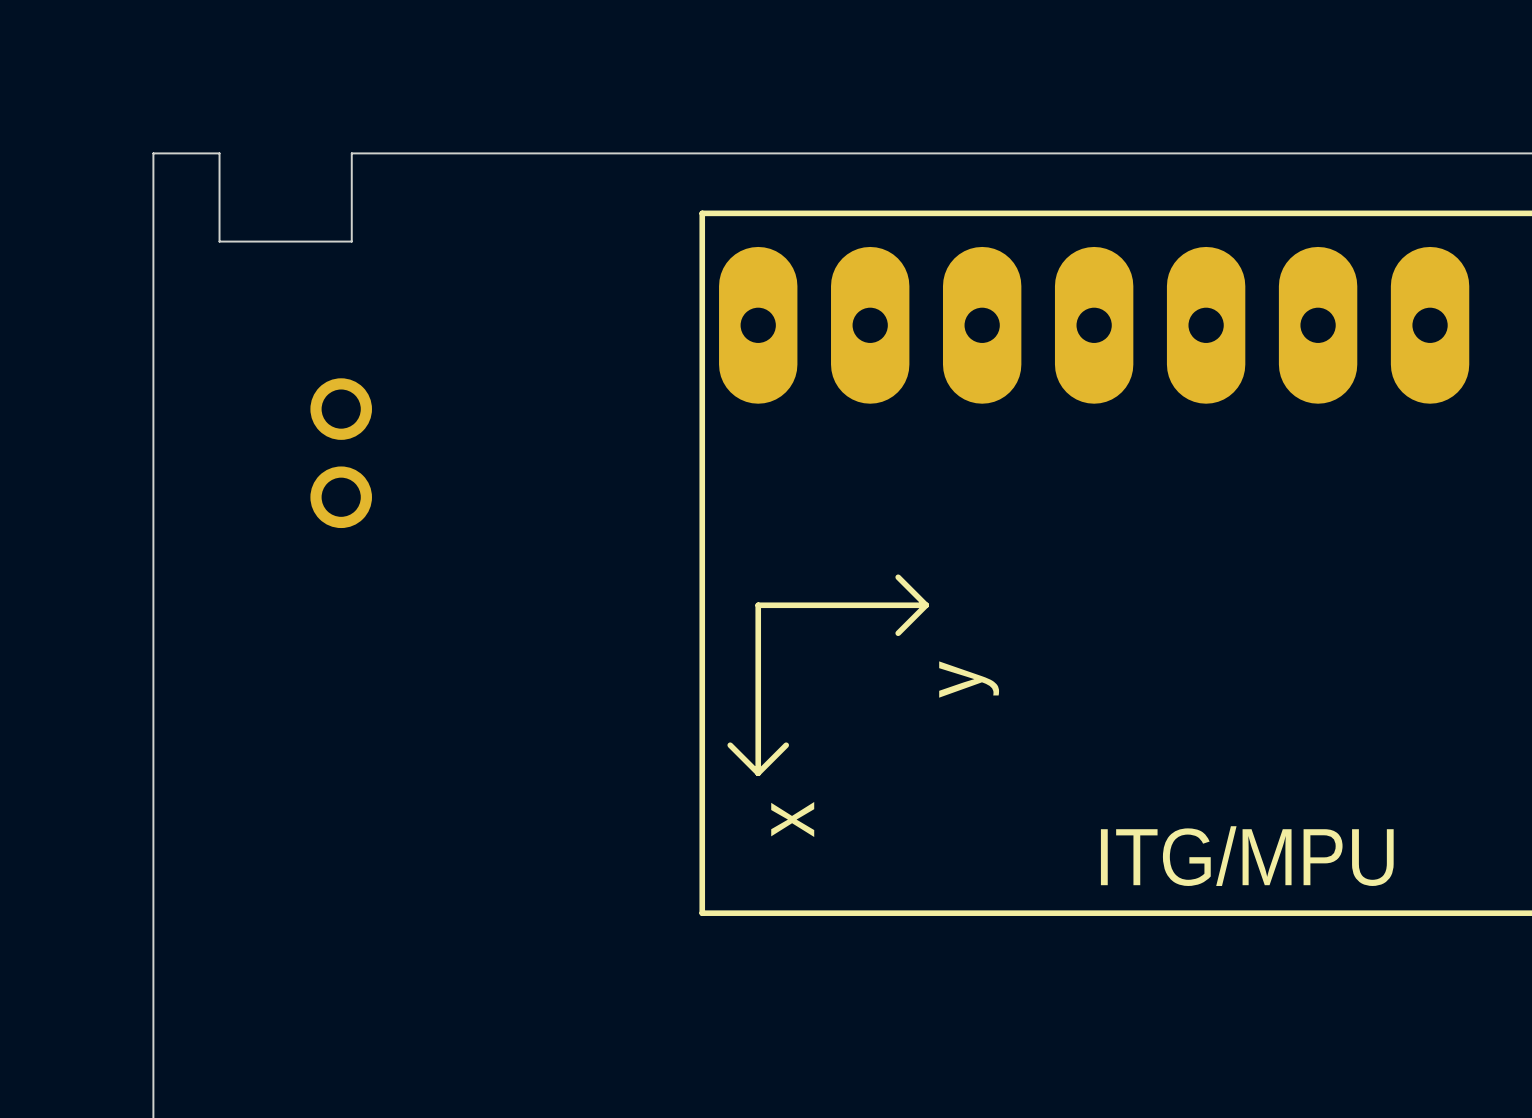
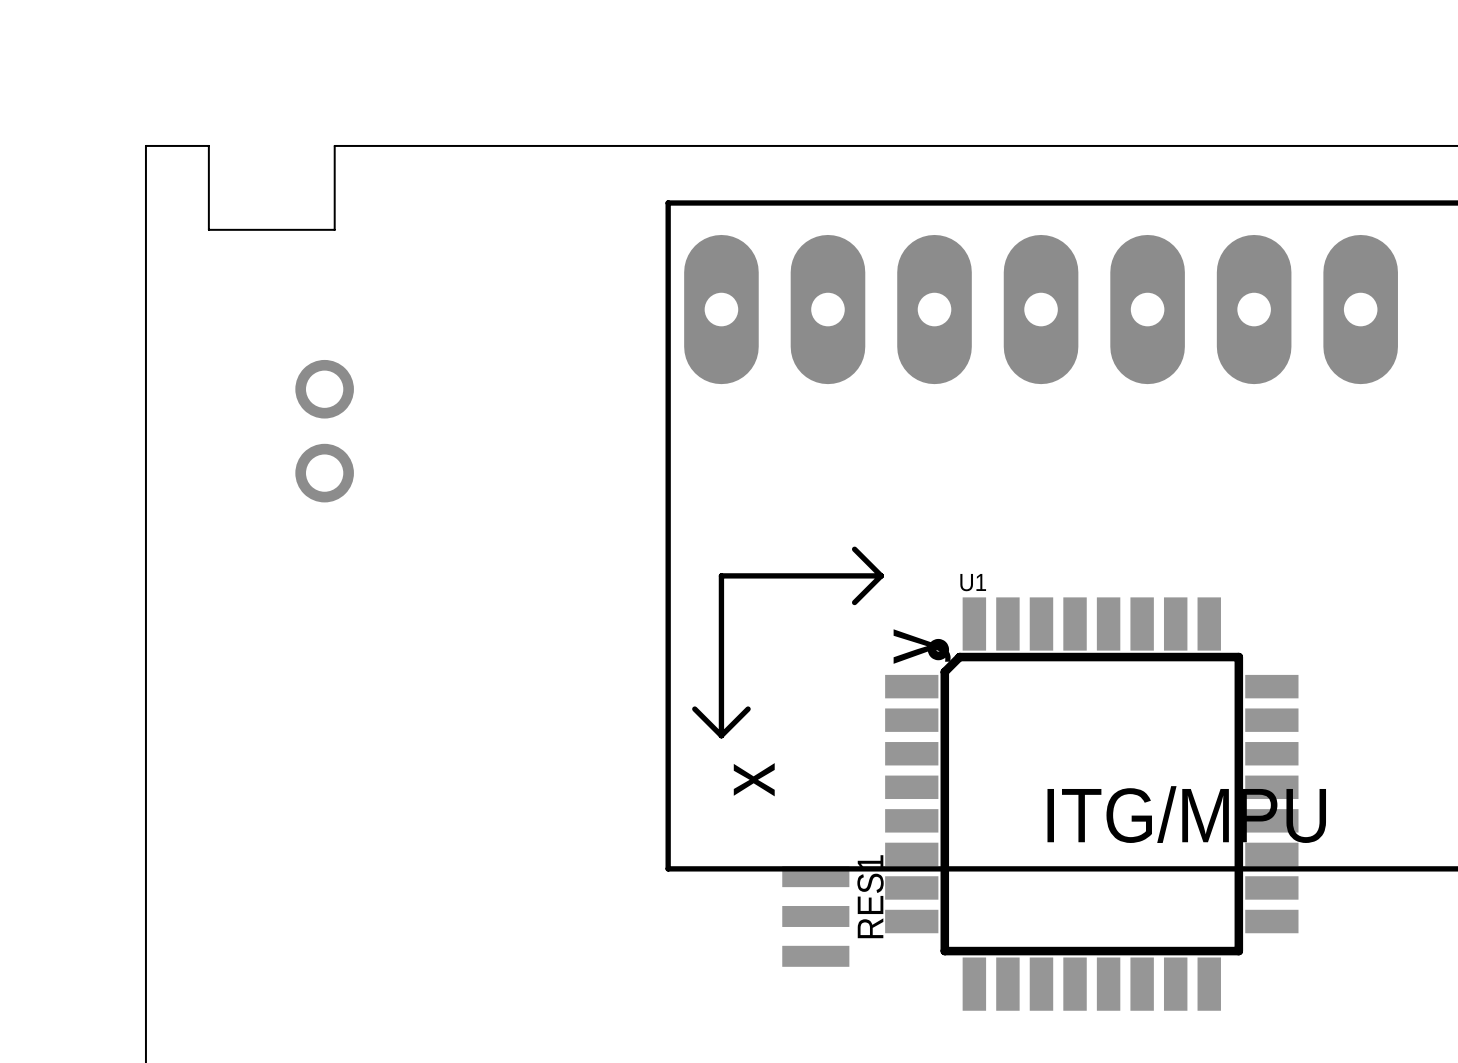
U1: none -> (1091, 804)
RES1: none -> (815, 916)

